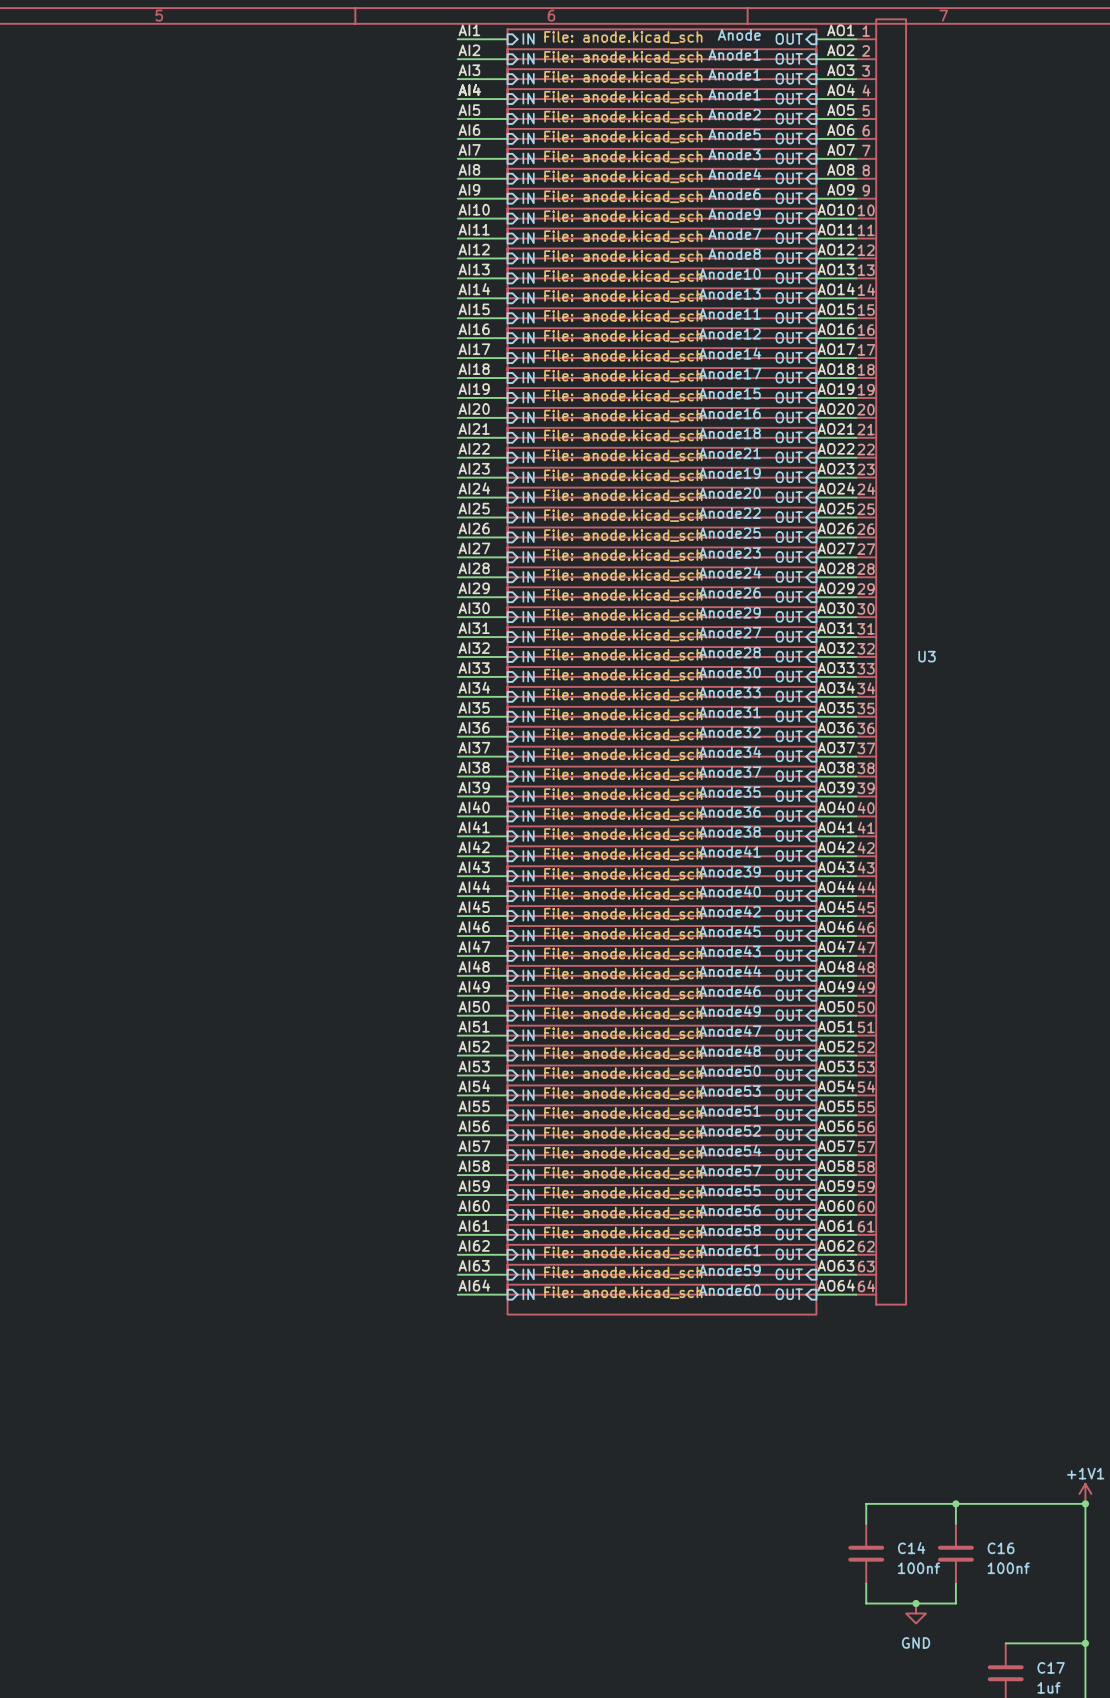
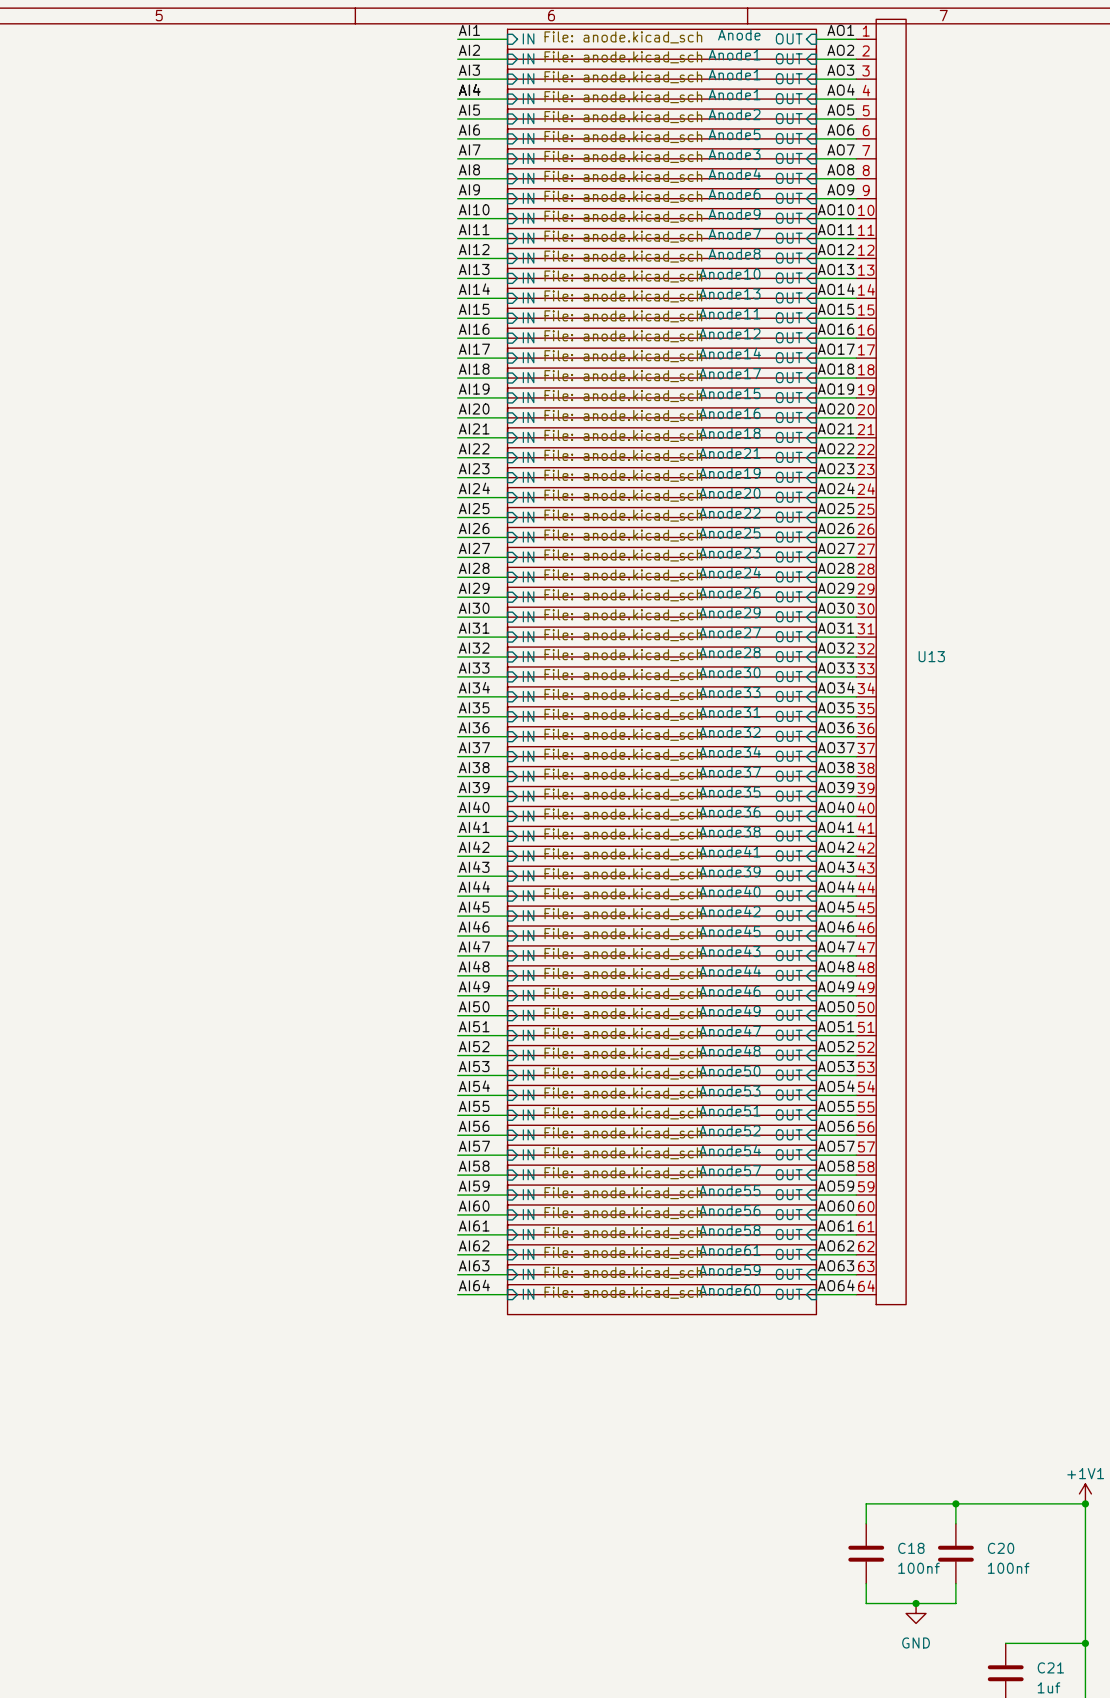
U3 name: U3 (927, 656) -> U13 (931, 656)
C14 name: C14 (911, 1548) -> C18 (911, 1548)
C16 name: C16 (1001, 1548) -> C20 (1001, 1548)
C17 name: C17 (1051, 1667) -> C21 (1050, 1667)

